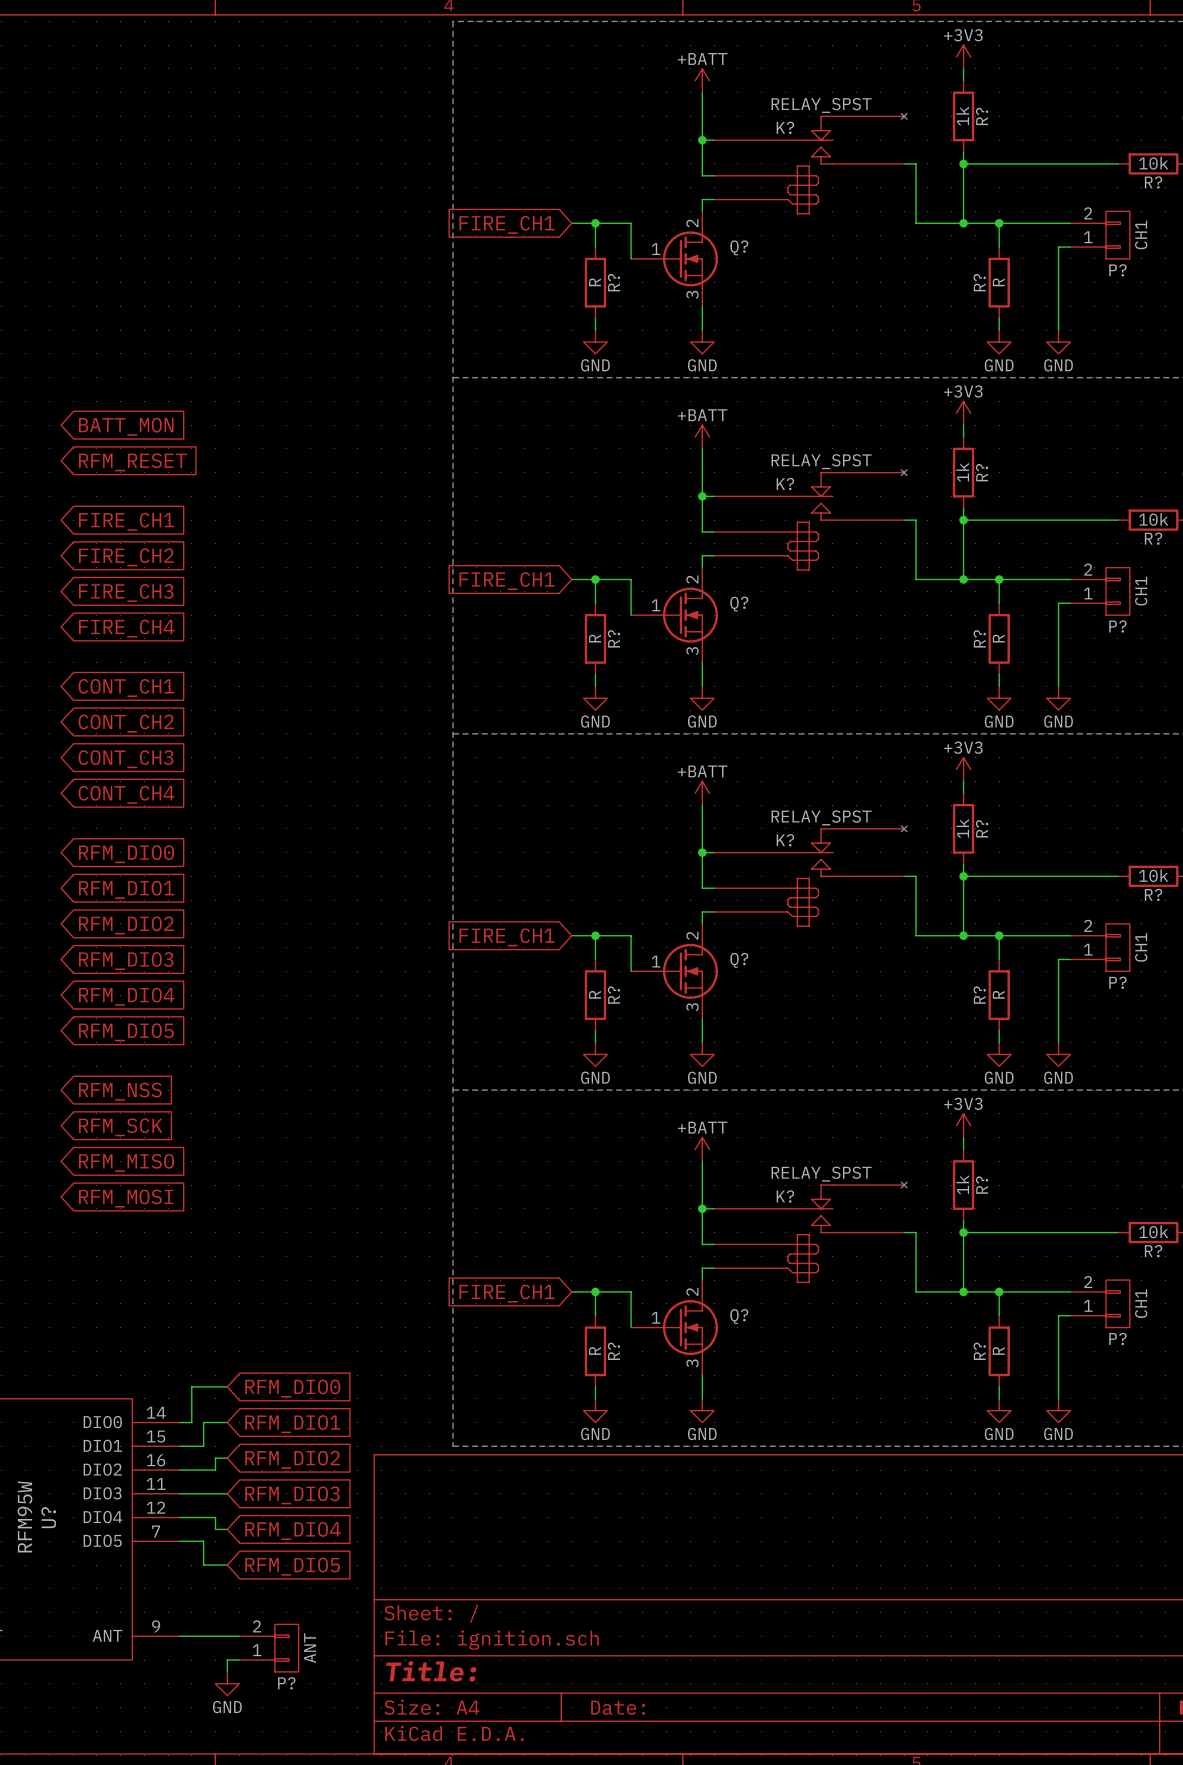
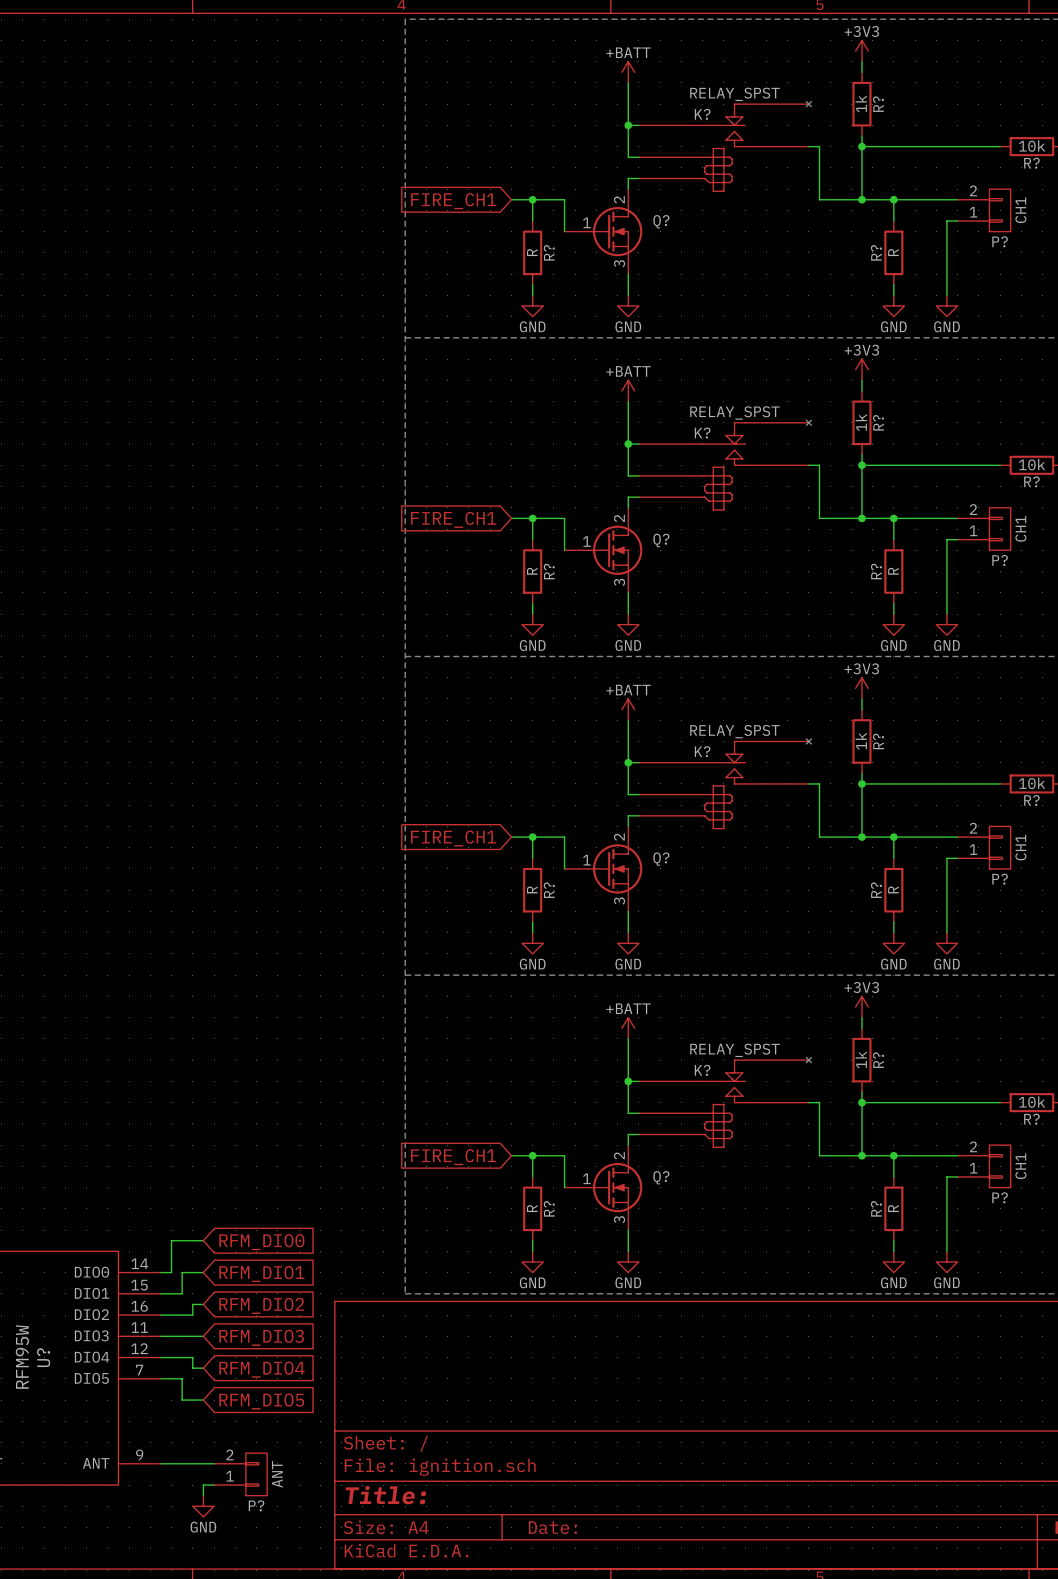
global label: BATT_MON (126, 426) -> none
global label: RFM_RESET (132, 462) -> none
global label: FIRE_CH1 (126, 521) -> none
global label: FIRE_CH2 (126, 557) -> none
global label: FIRE_CH3 (126, 592) -> none
global label: FIRE_CH4 (126, 628) -> none
global label: CONT_CH1 (126, 687) -> none
global label: CONT_CH2 (126, 723) -> none
global label: CONT_CH3 (126, 759) -> none
global label: CONT_CH4 (126, 794) -> none
global label: RFM_DIO0 (126, 854) -> none
global label: RFM_DIO1 (126, 889) -> none
global label: RFM_DIO2 (126, 925) -> none
global label: RFM_DIO3 (126, 961) -> none
global label: RFM_DIO4 (126, 996) -> none
global label: RFM_DIO5 (126, 1032) -> none
global label: RFM_NSS (120, 1091) -> none
global label: RFM_SCK (120, 1127) -> none
global label: RFM_MISO (126, 1162) -> none
global label: RFM_MOSI (126, 1198) -> none

